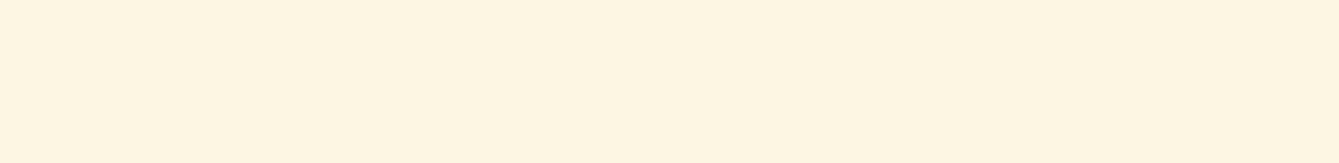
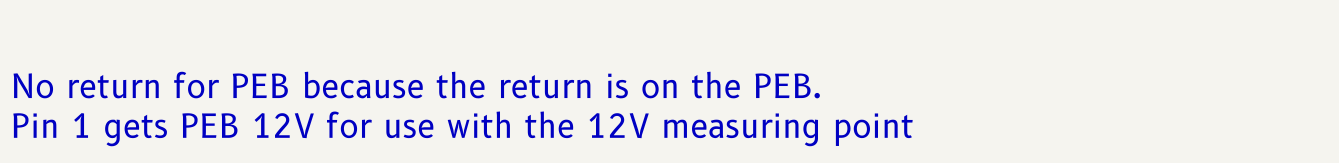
text: none -> No return for PEB because the return is on the PEB. (416, 85)
text: none -> Pin 1 gets PEB 12V for use with the 12V measuring point (463, 128)

